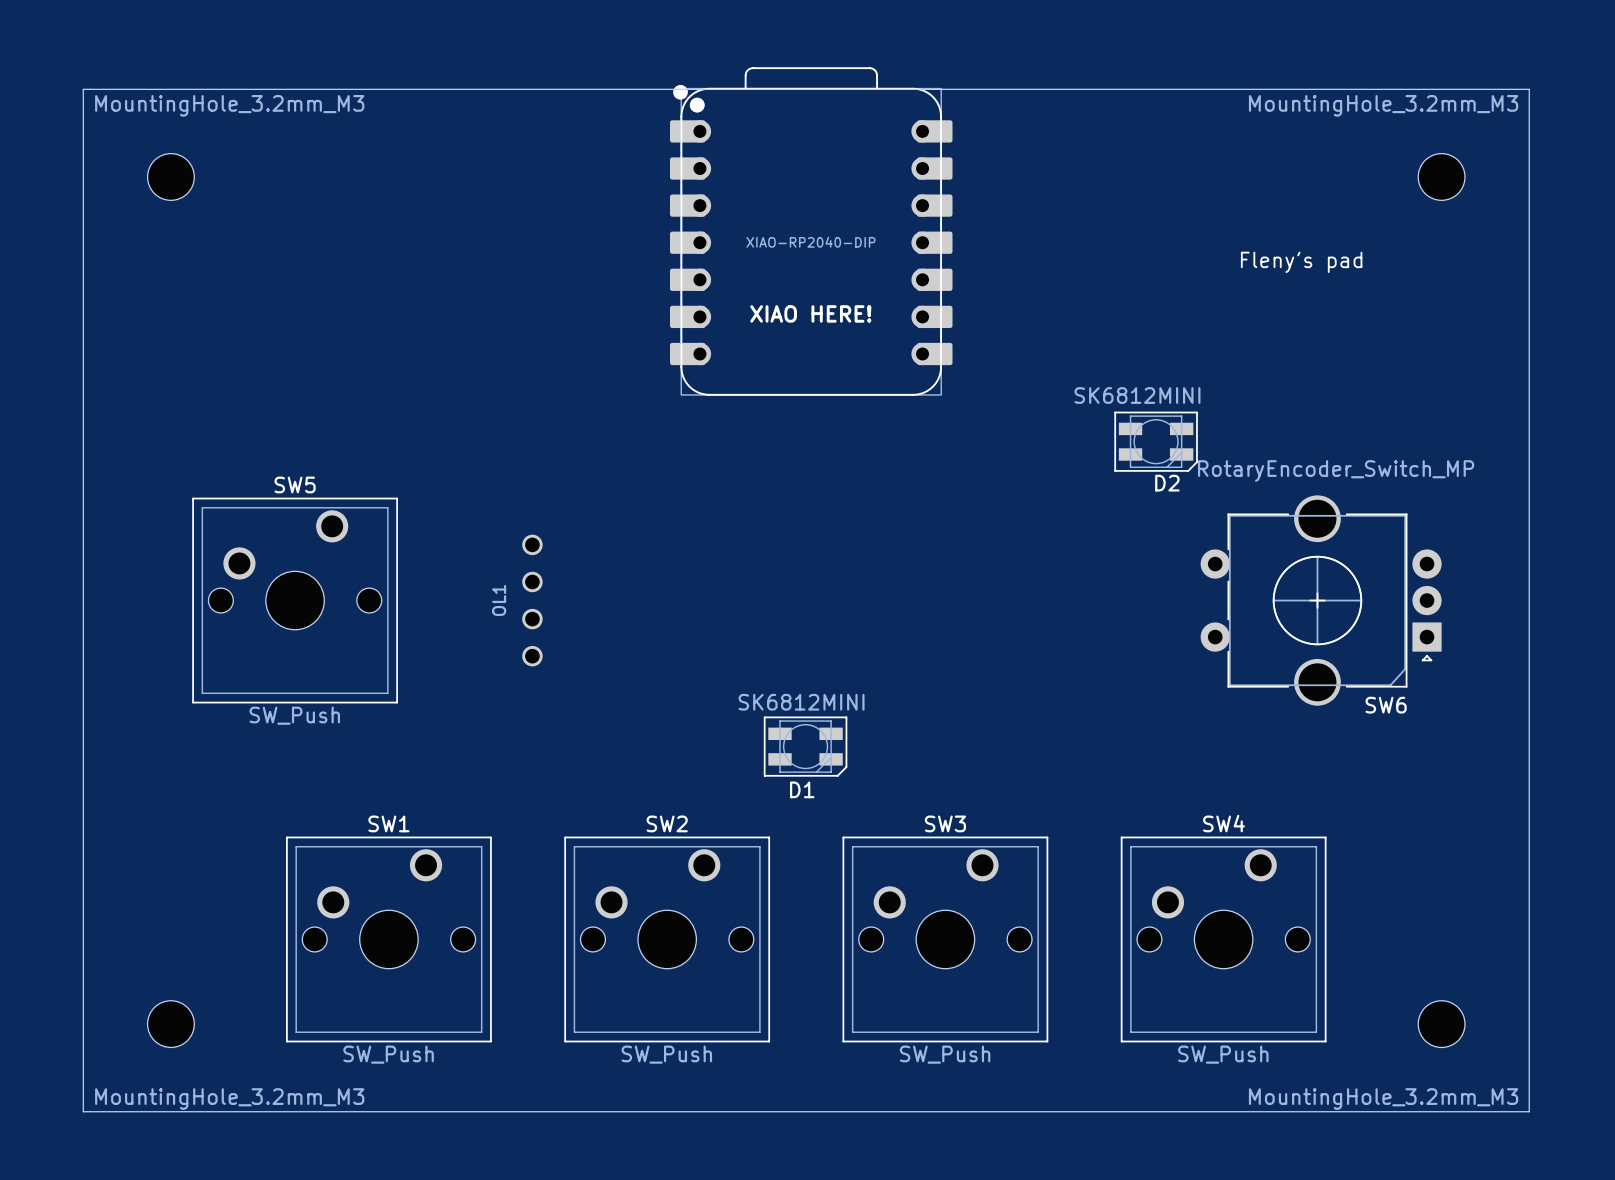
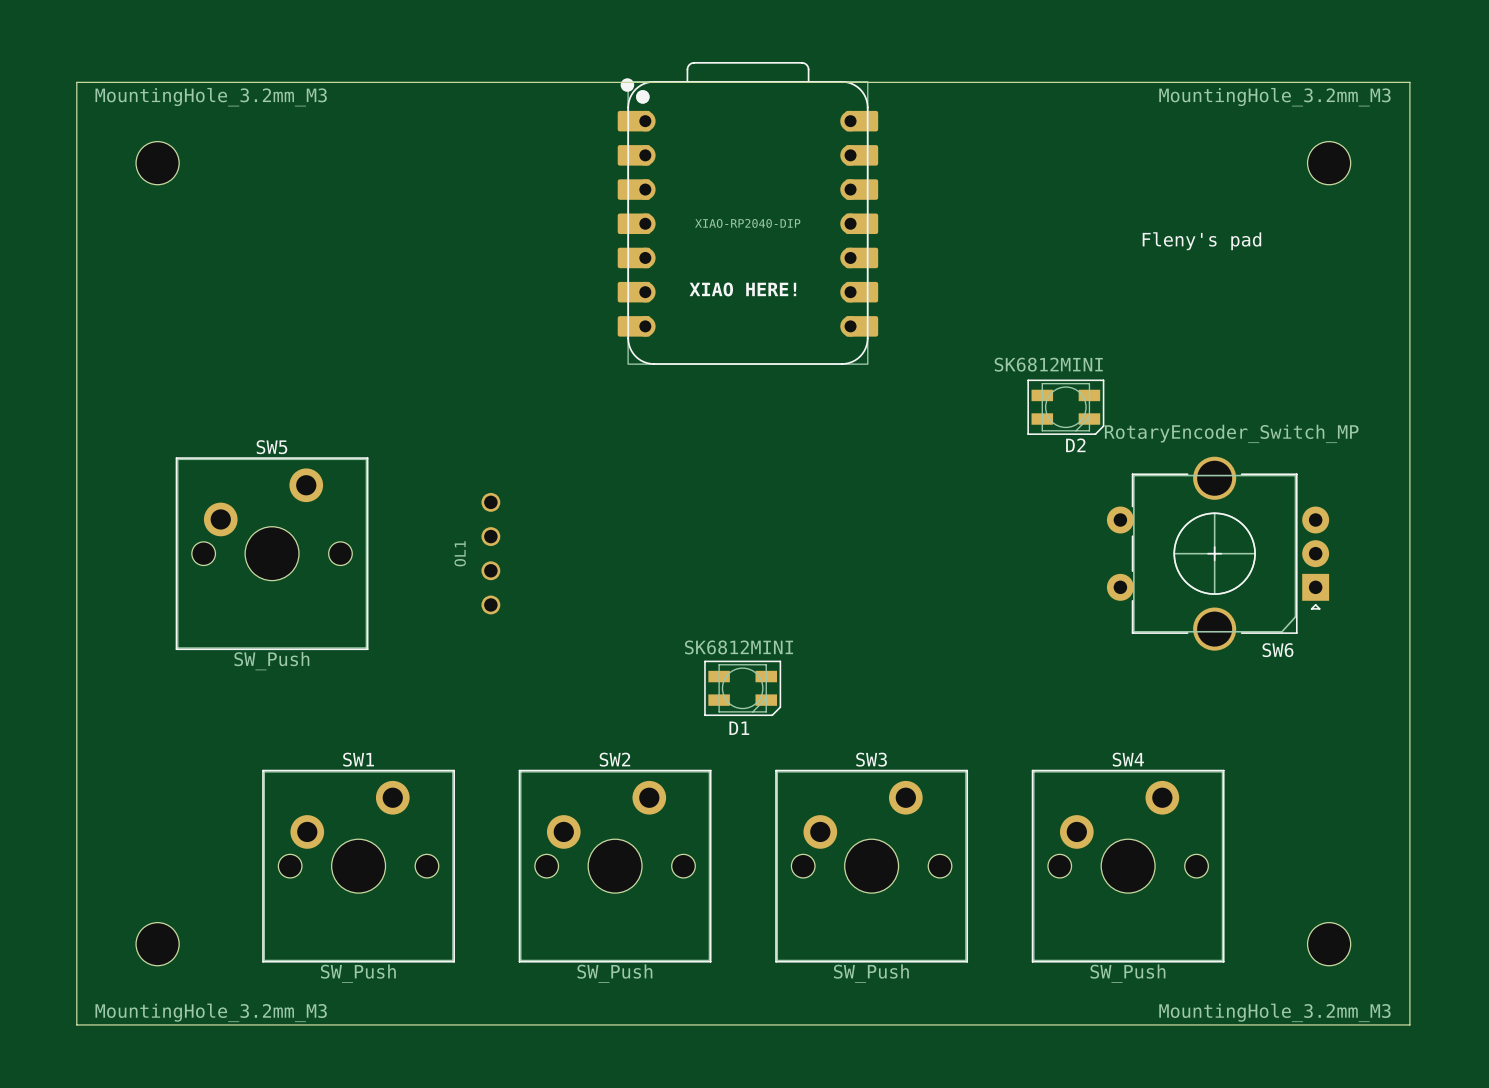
SW5 footprint: [192, 497, 398, 704] -> [175, 457, 369, 651]
SW1 footprint: [286, 836, 492, 1043] -> [262, 769, 455, 963]
SW2 footprint: [564, 836, 771, 1043] -> [518, 769, 712, 963]
SW3 footprint: [842, 836, 1049, 1043] -> [775, 769, 969, 963]
SW4 footprint: [1120, 836, 1327, 1043] -> [1031, 769, 1225, 963]

